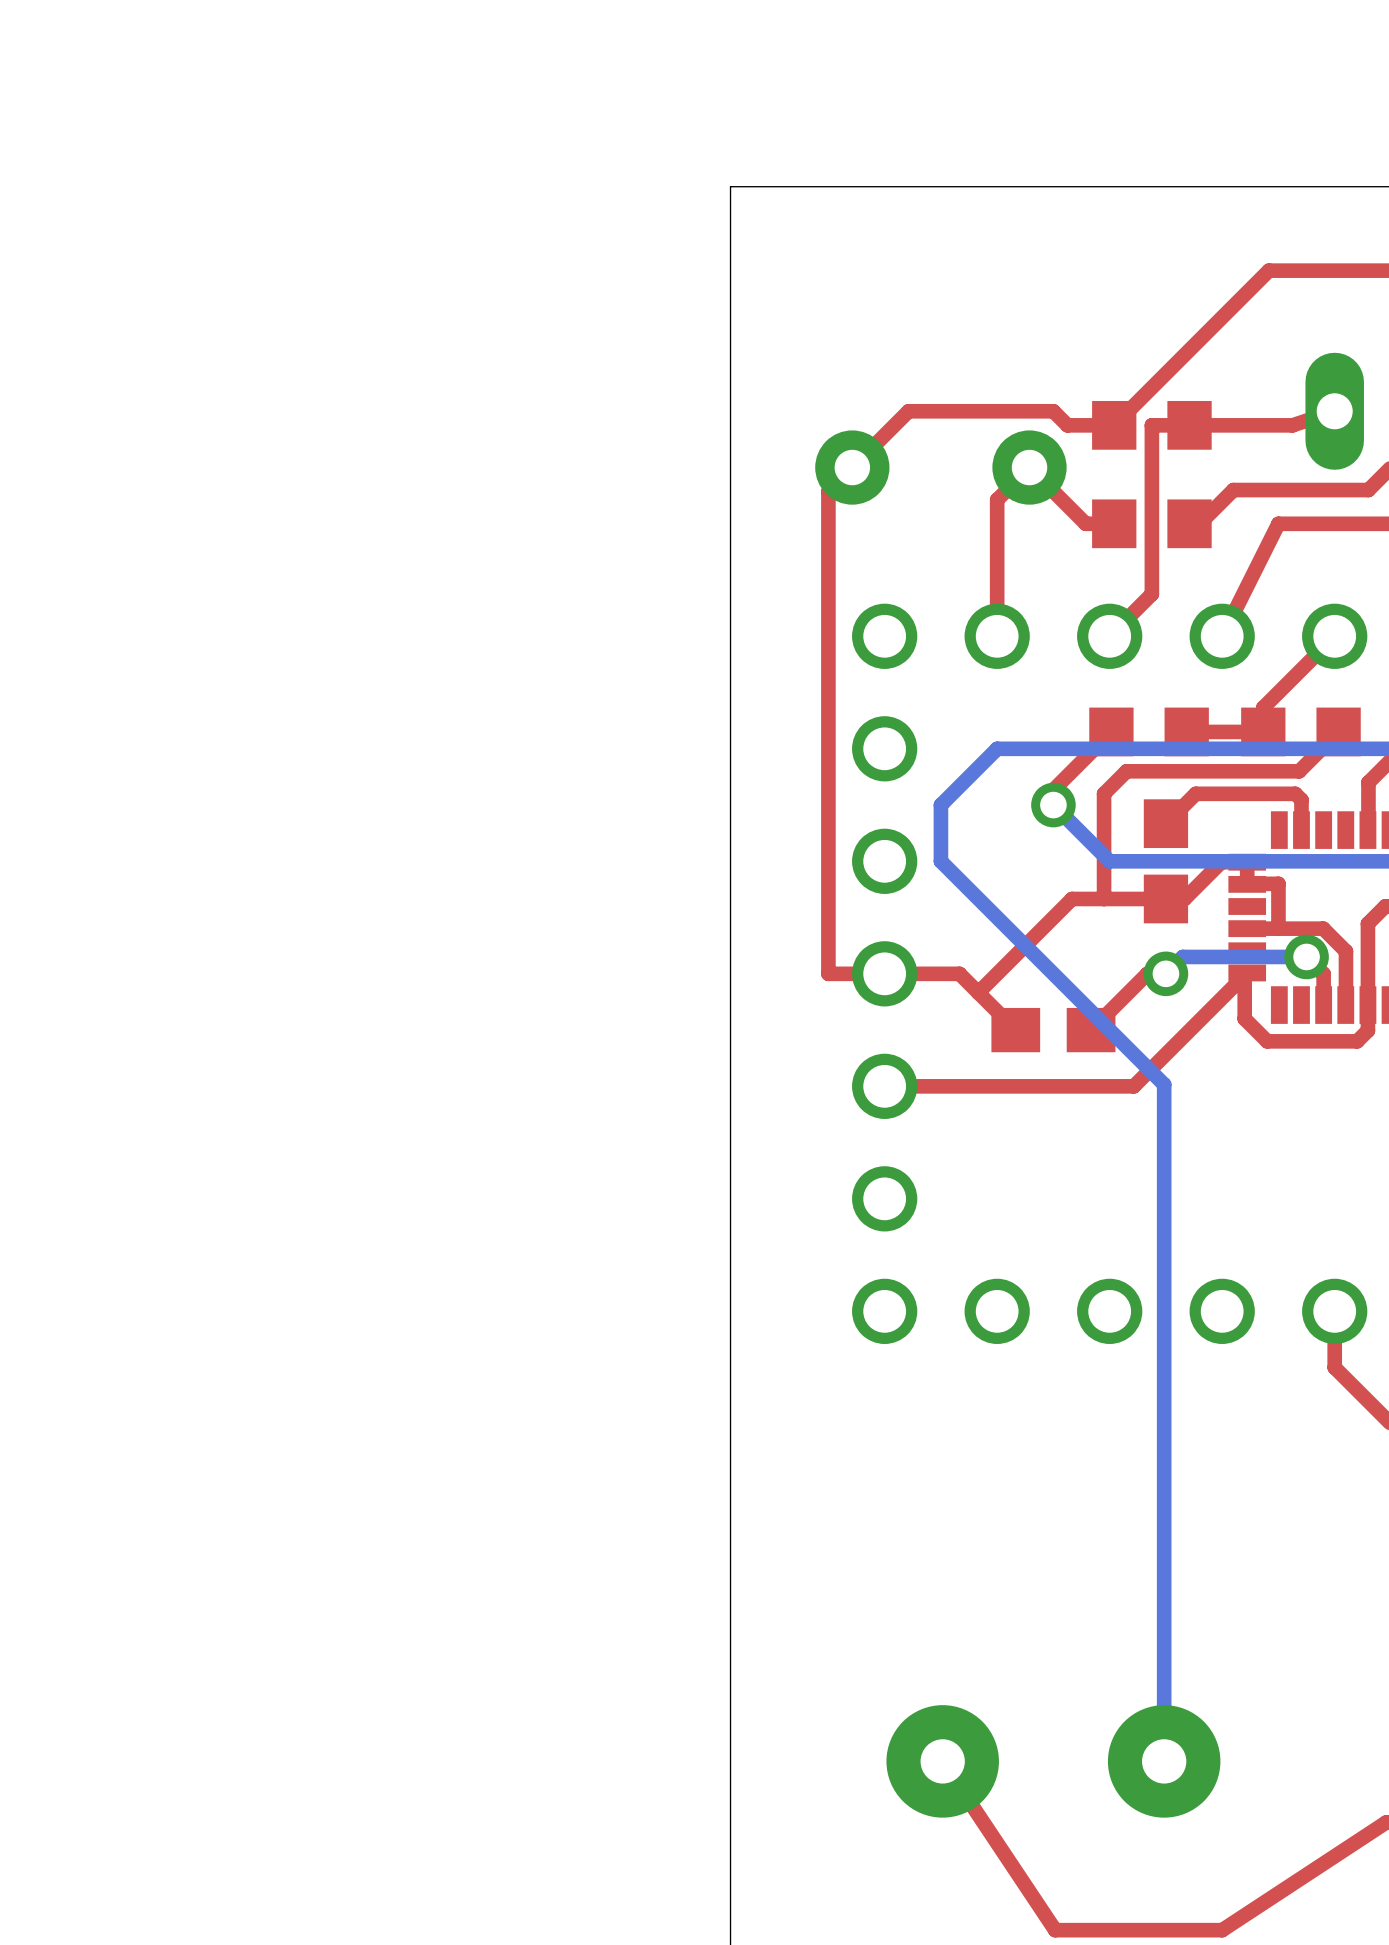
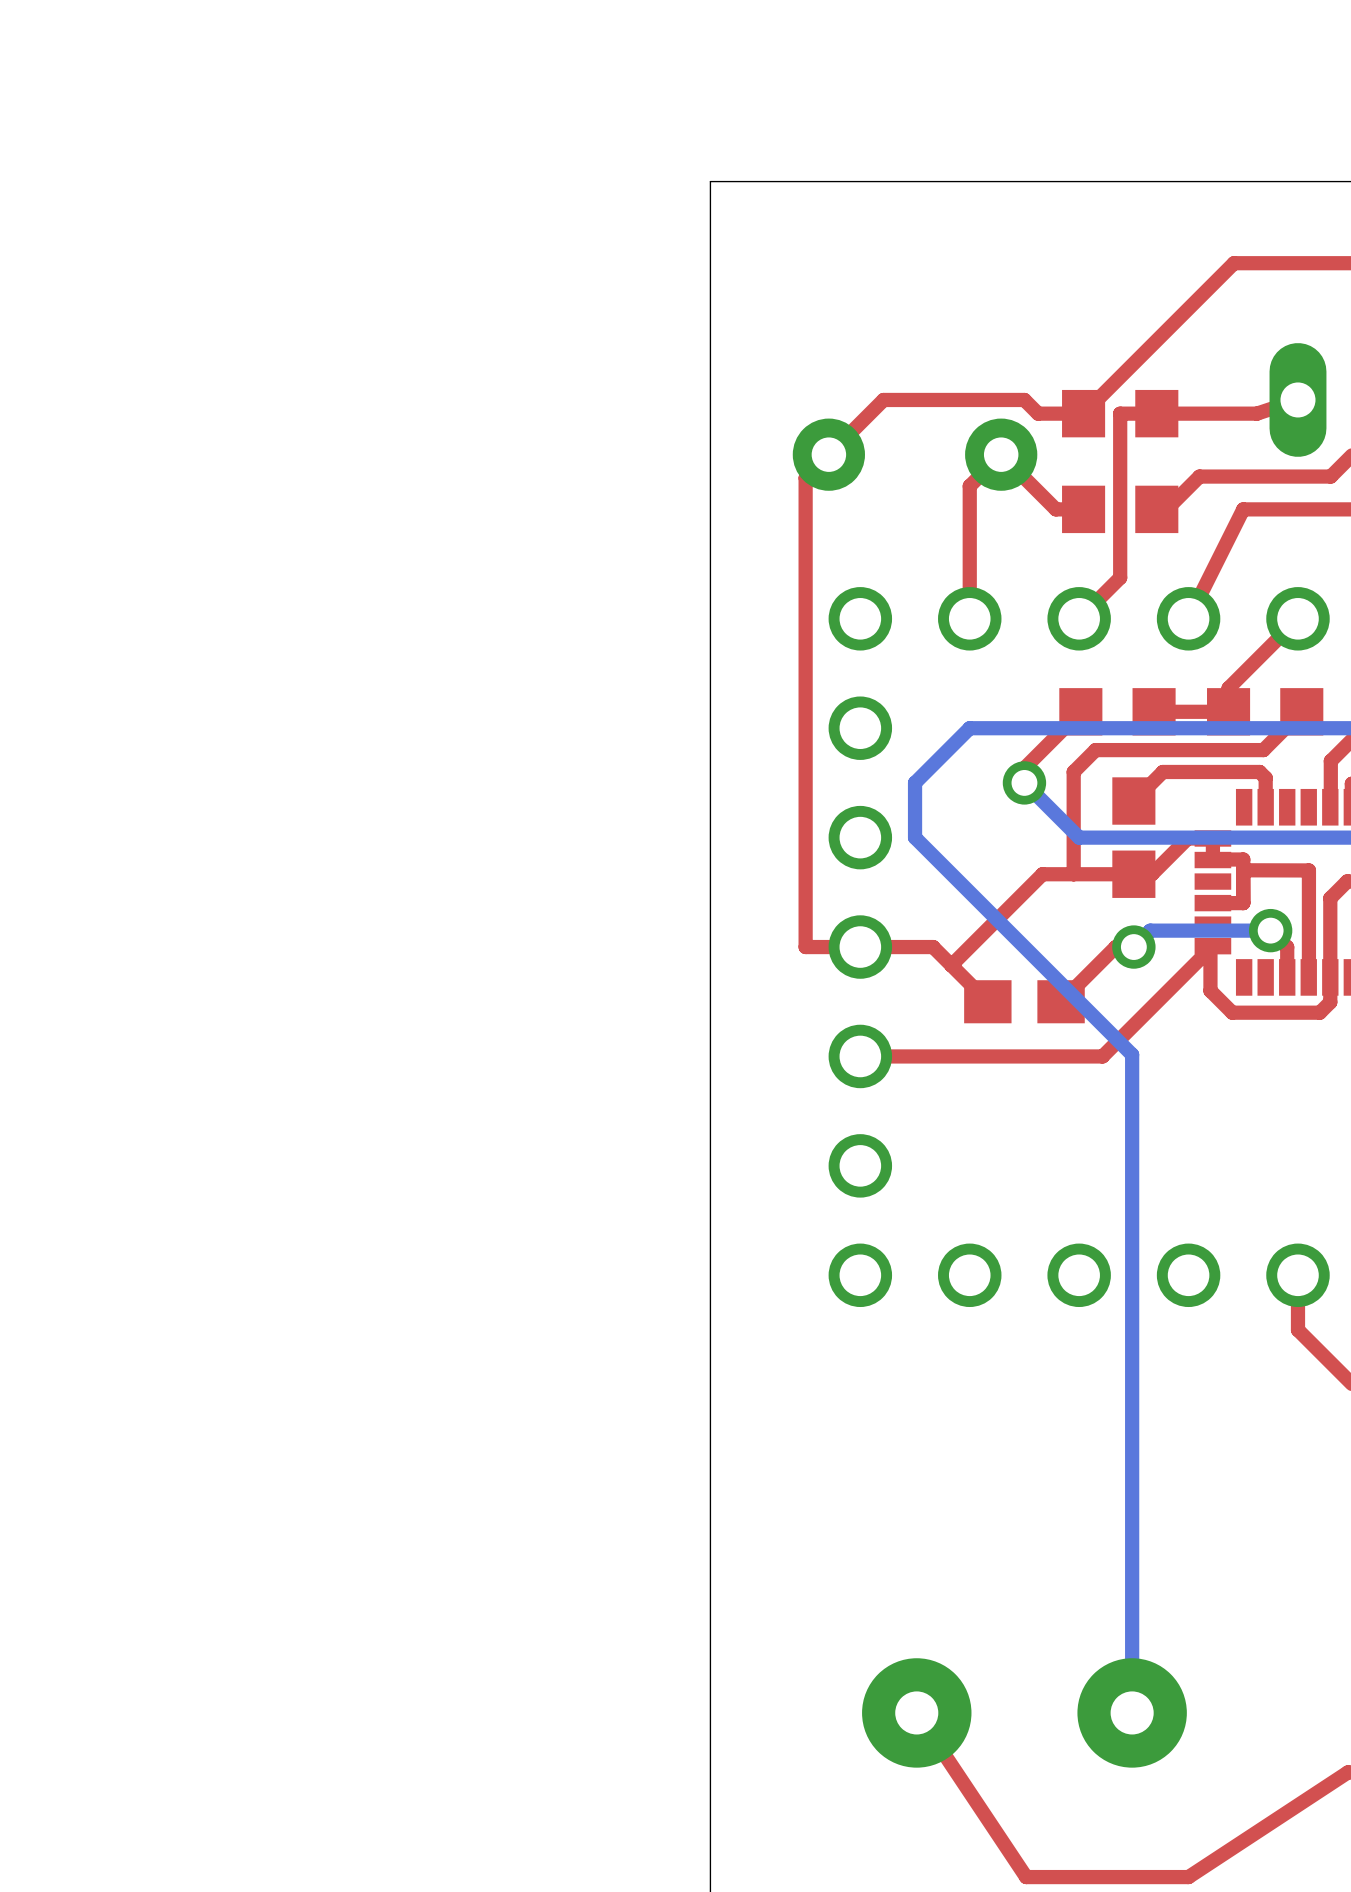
top track: (1278, 928) (1323, 928) (1345, 951) -> (1243, 903) (1243, 870) (1308, 870) (1308, 925)

